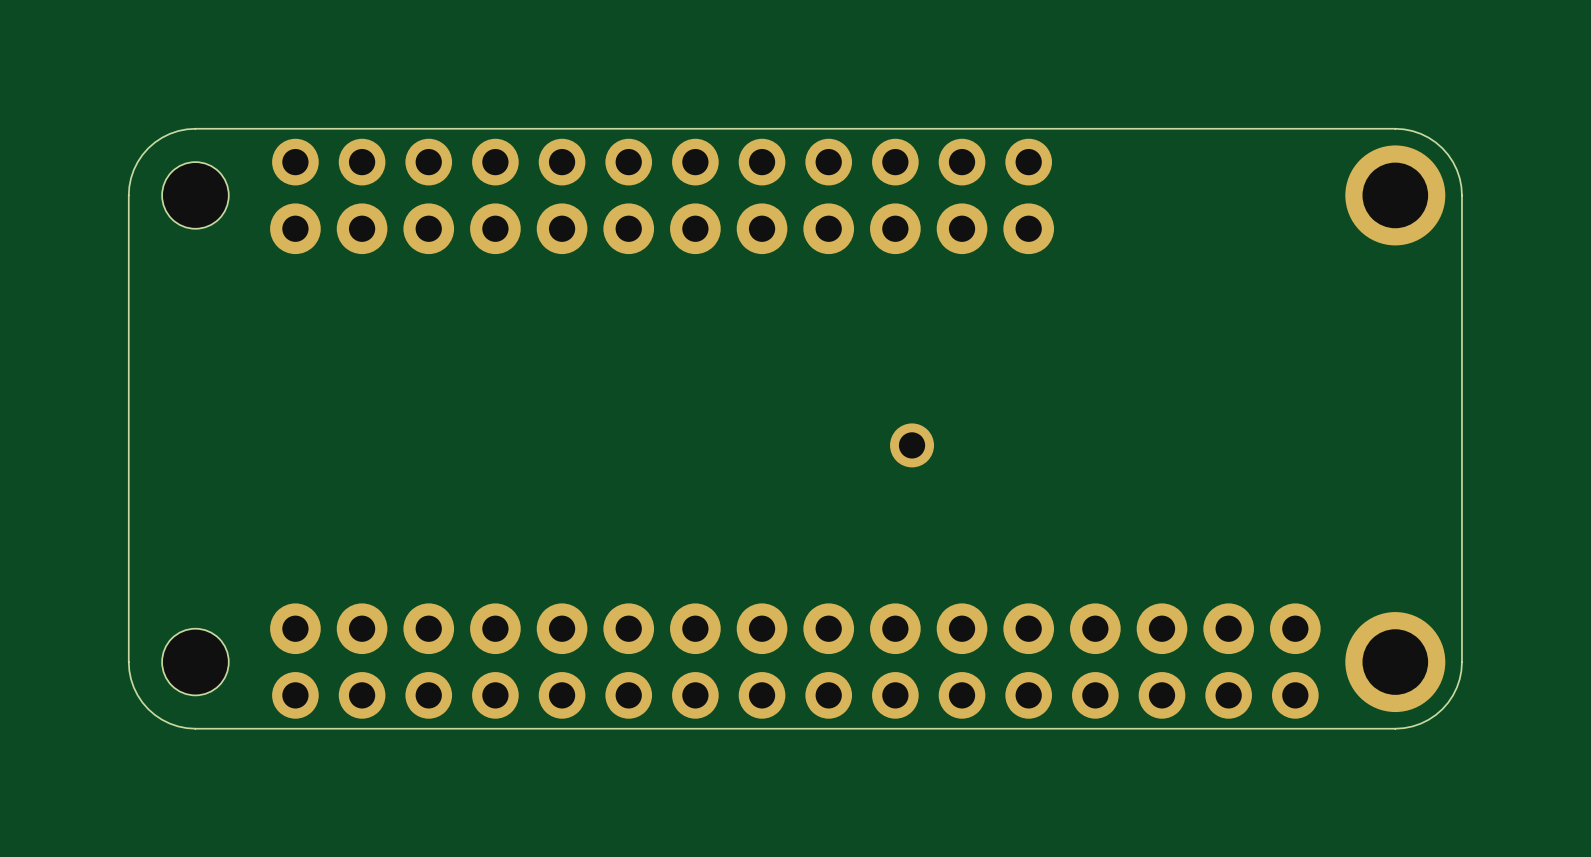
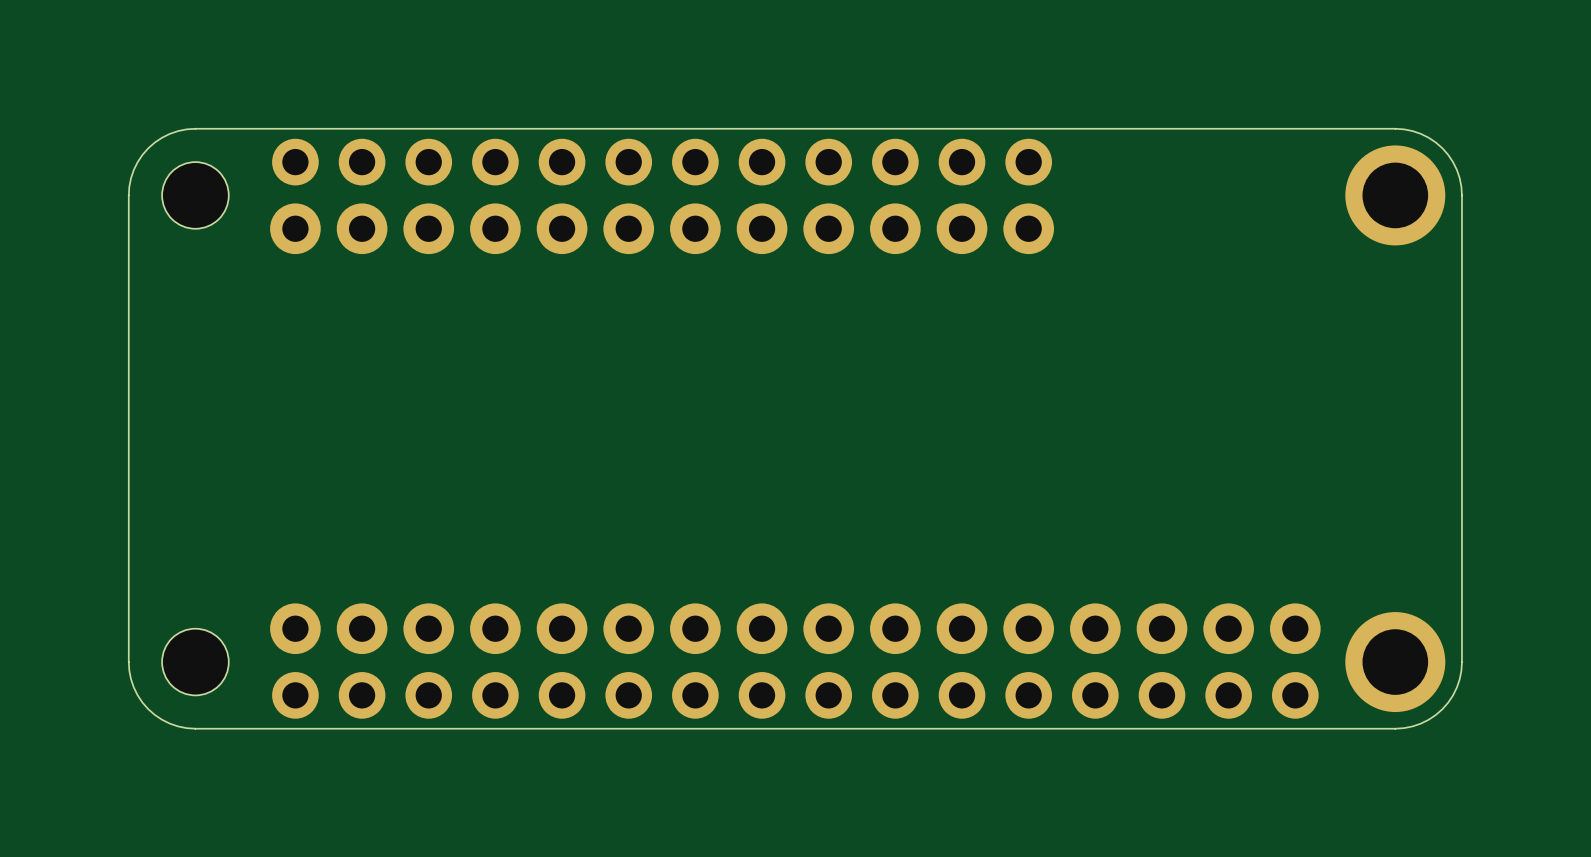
part: (912, 445) -> none

